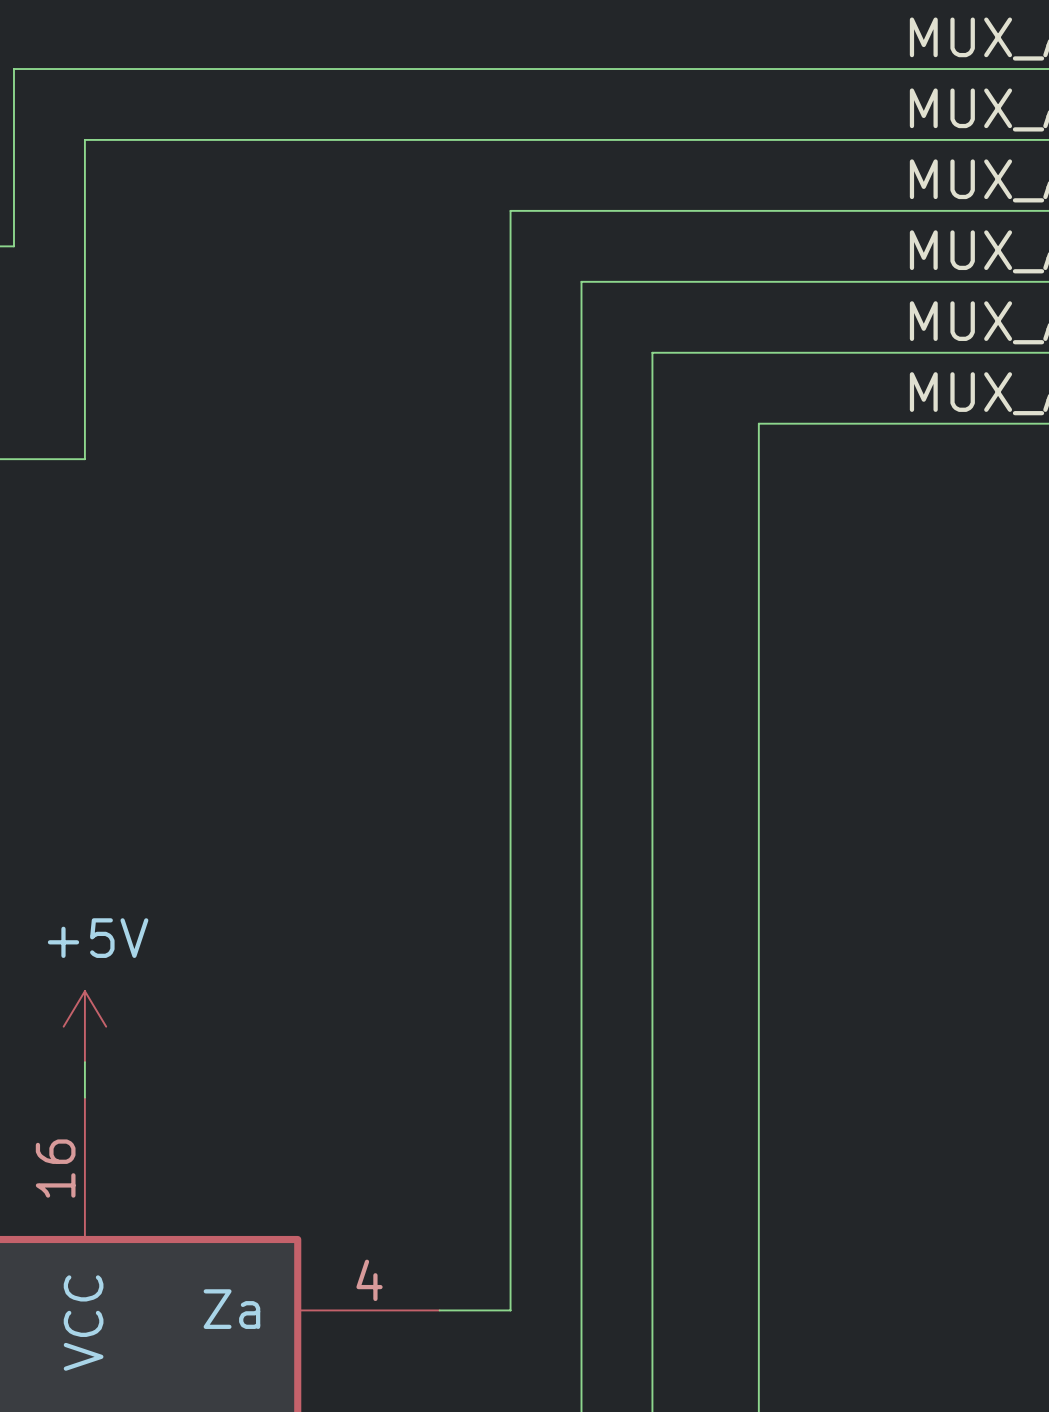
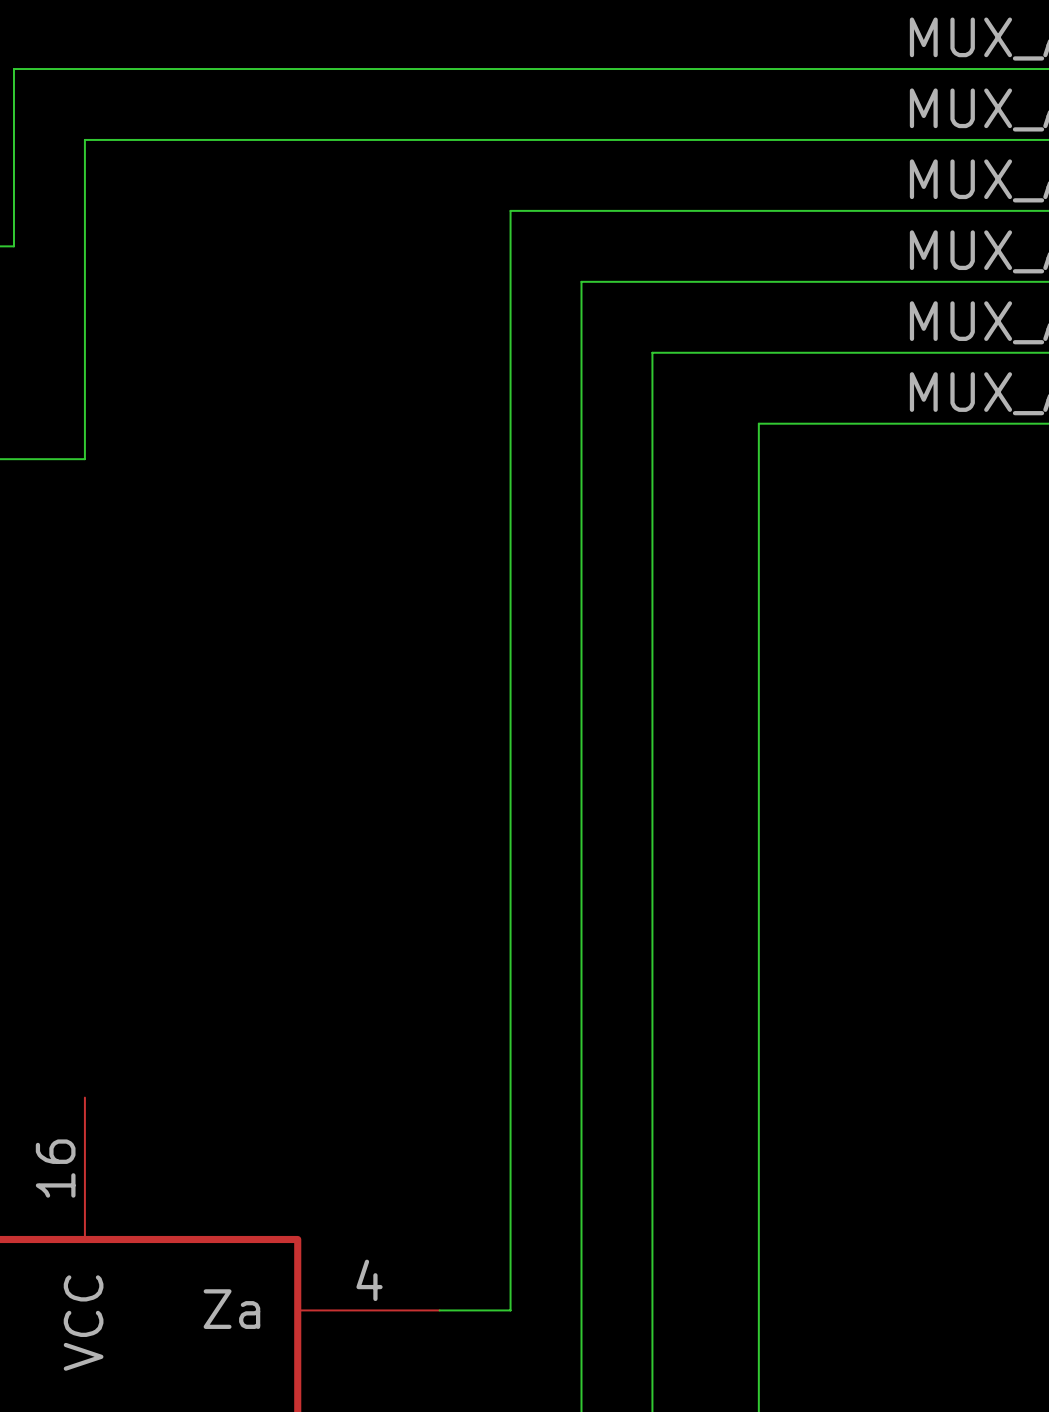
power symbol: +5V (84, 1026) -> none
wire: (84, 1062) (84, 1097) -> none

